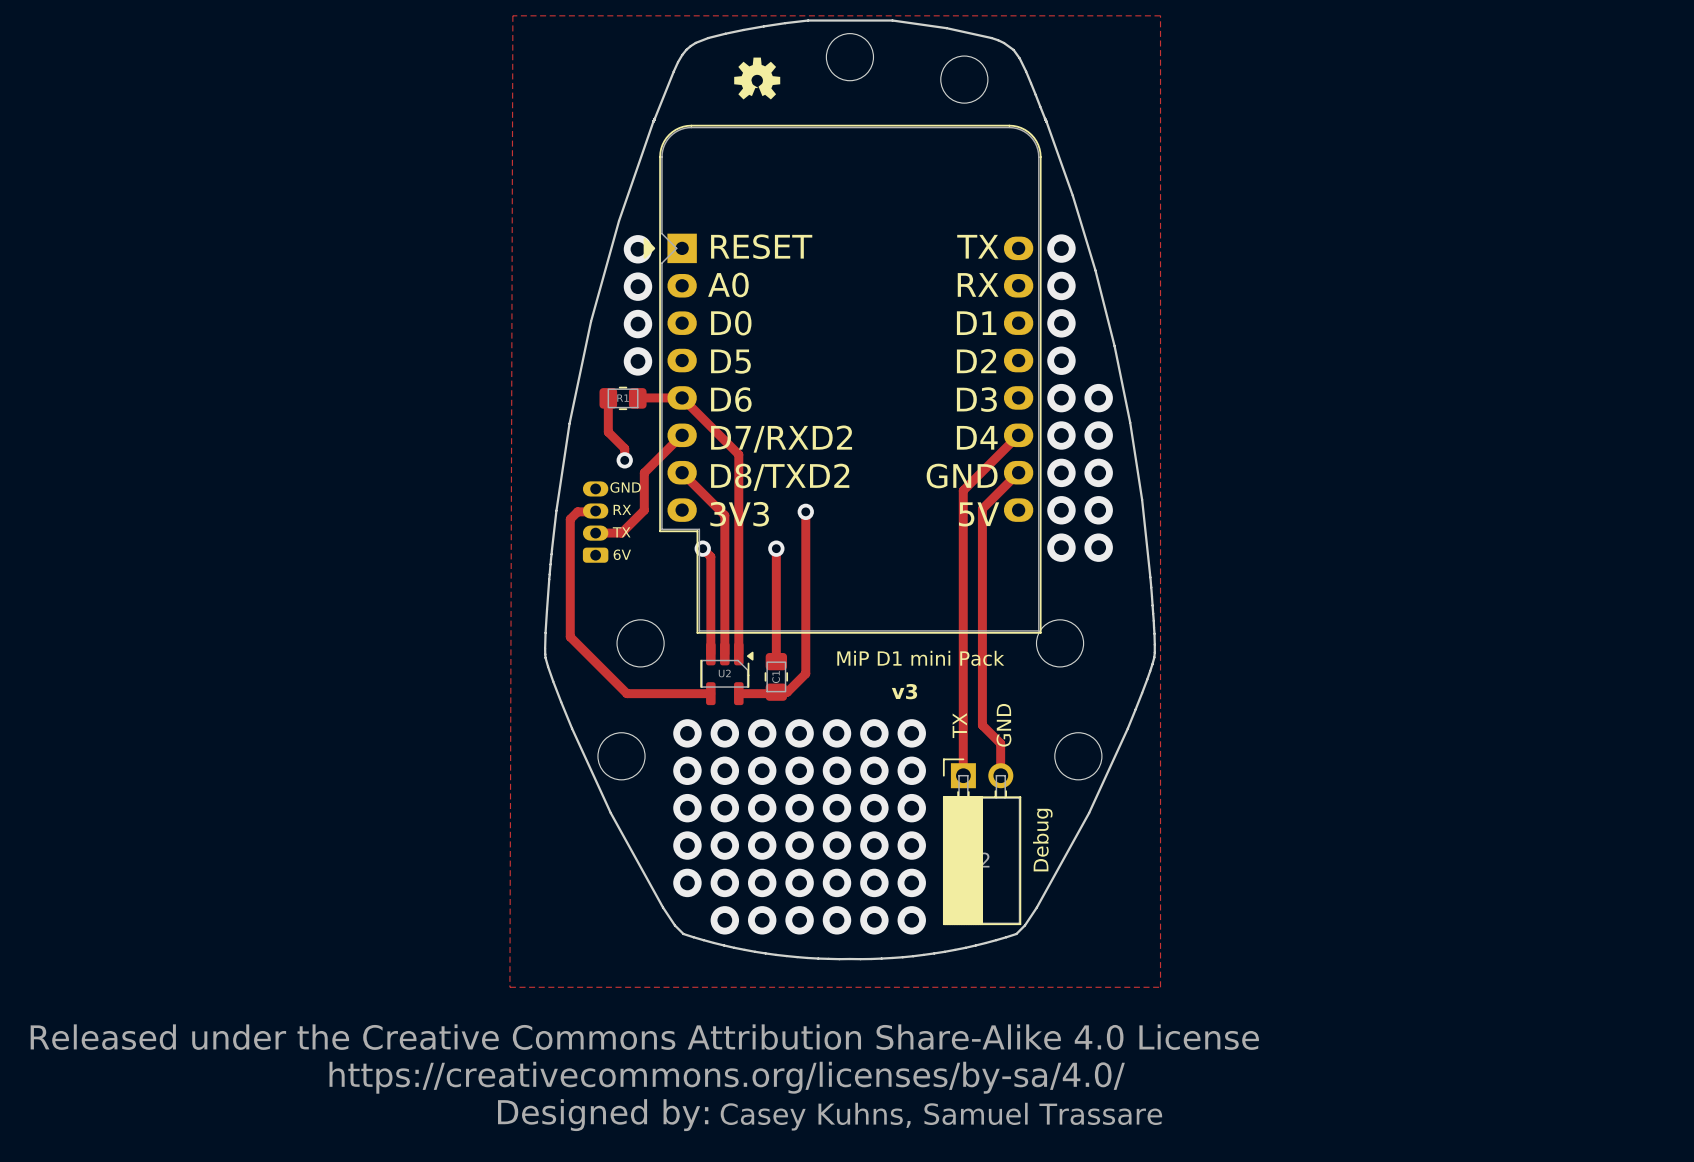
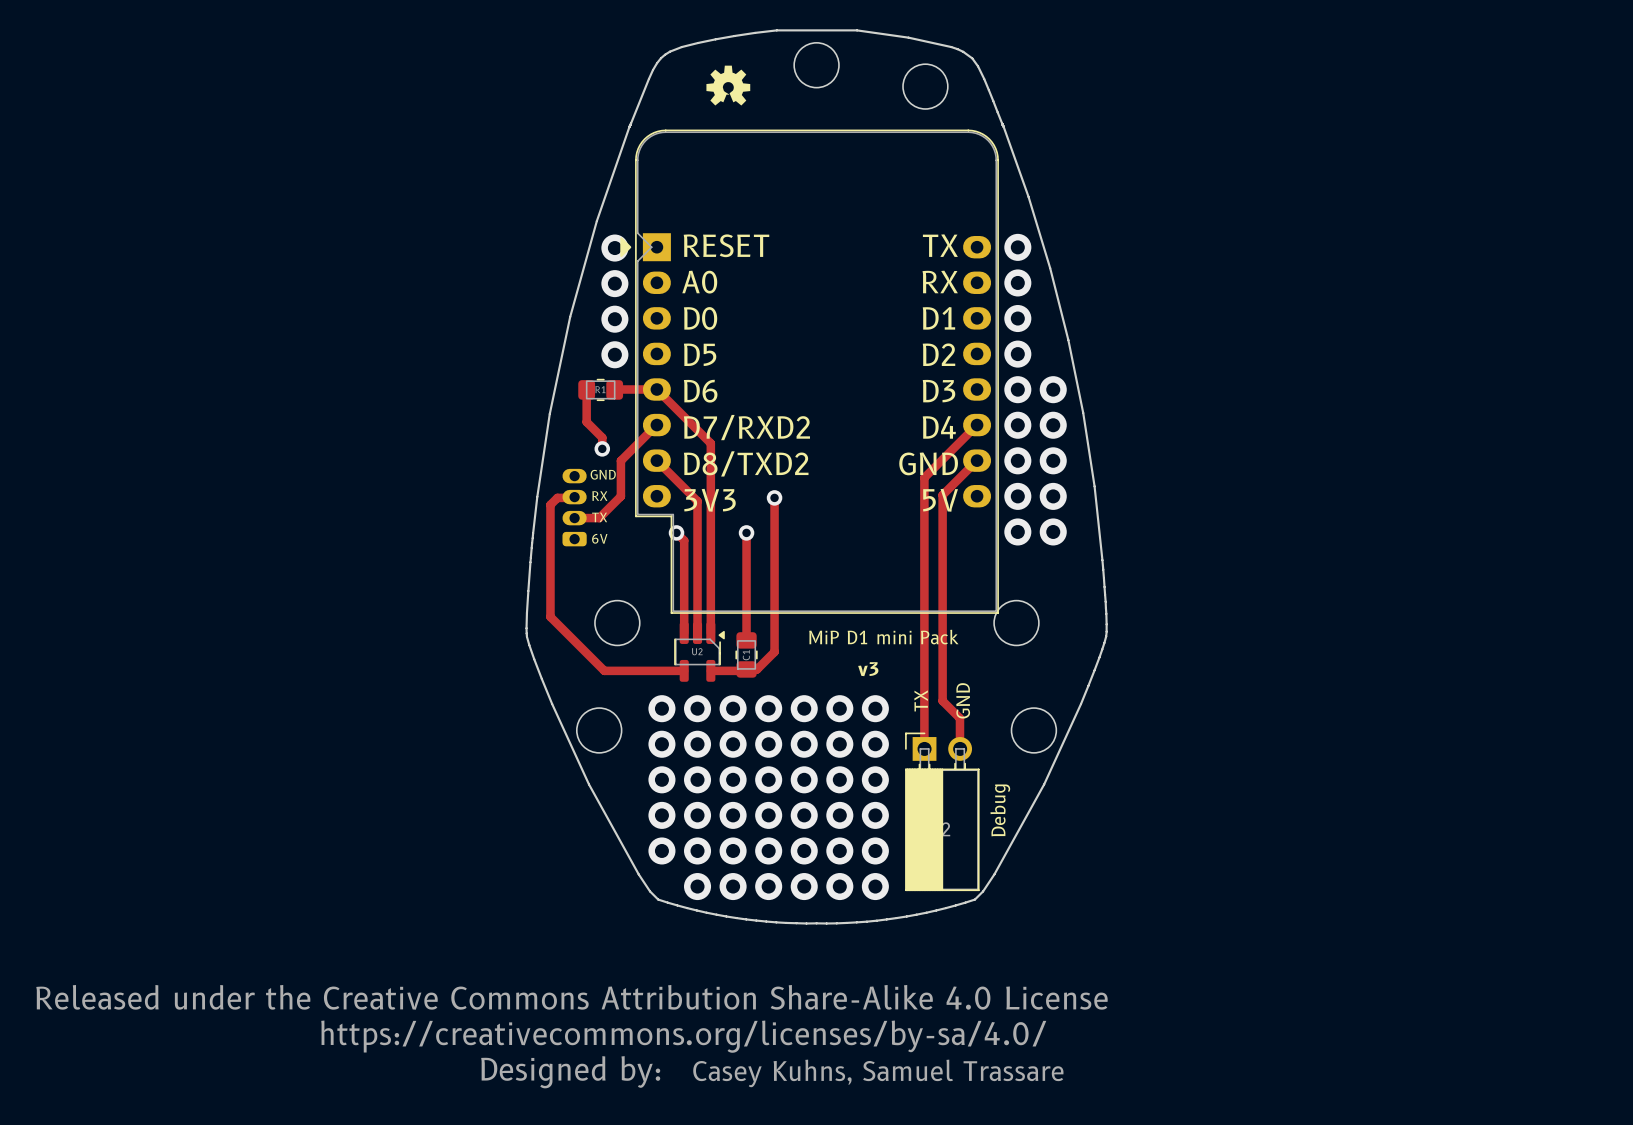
zone outline: (512, 15) (509, 987) (1160, 987) (1160, 15) (512, 15) -> none

